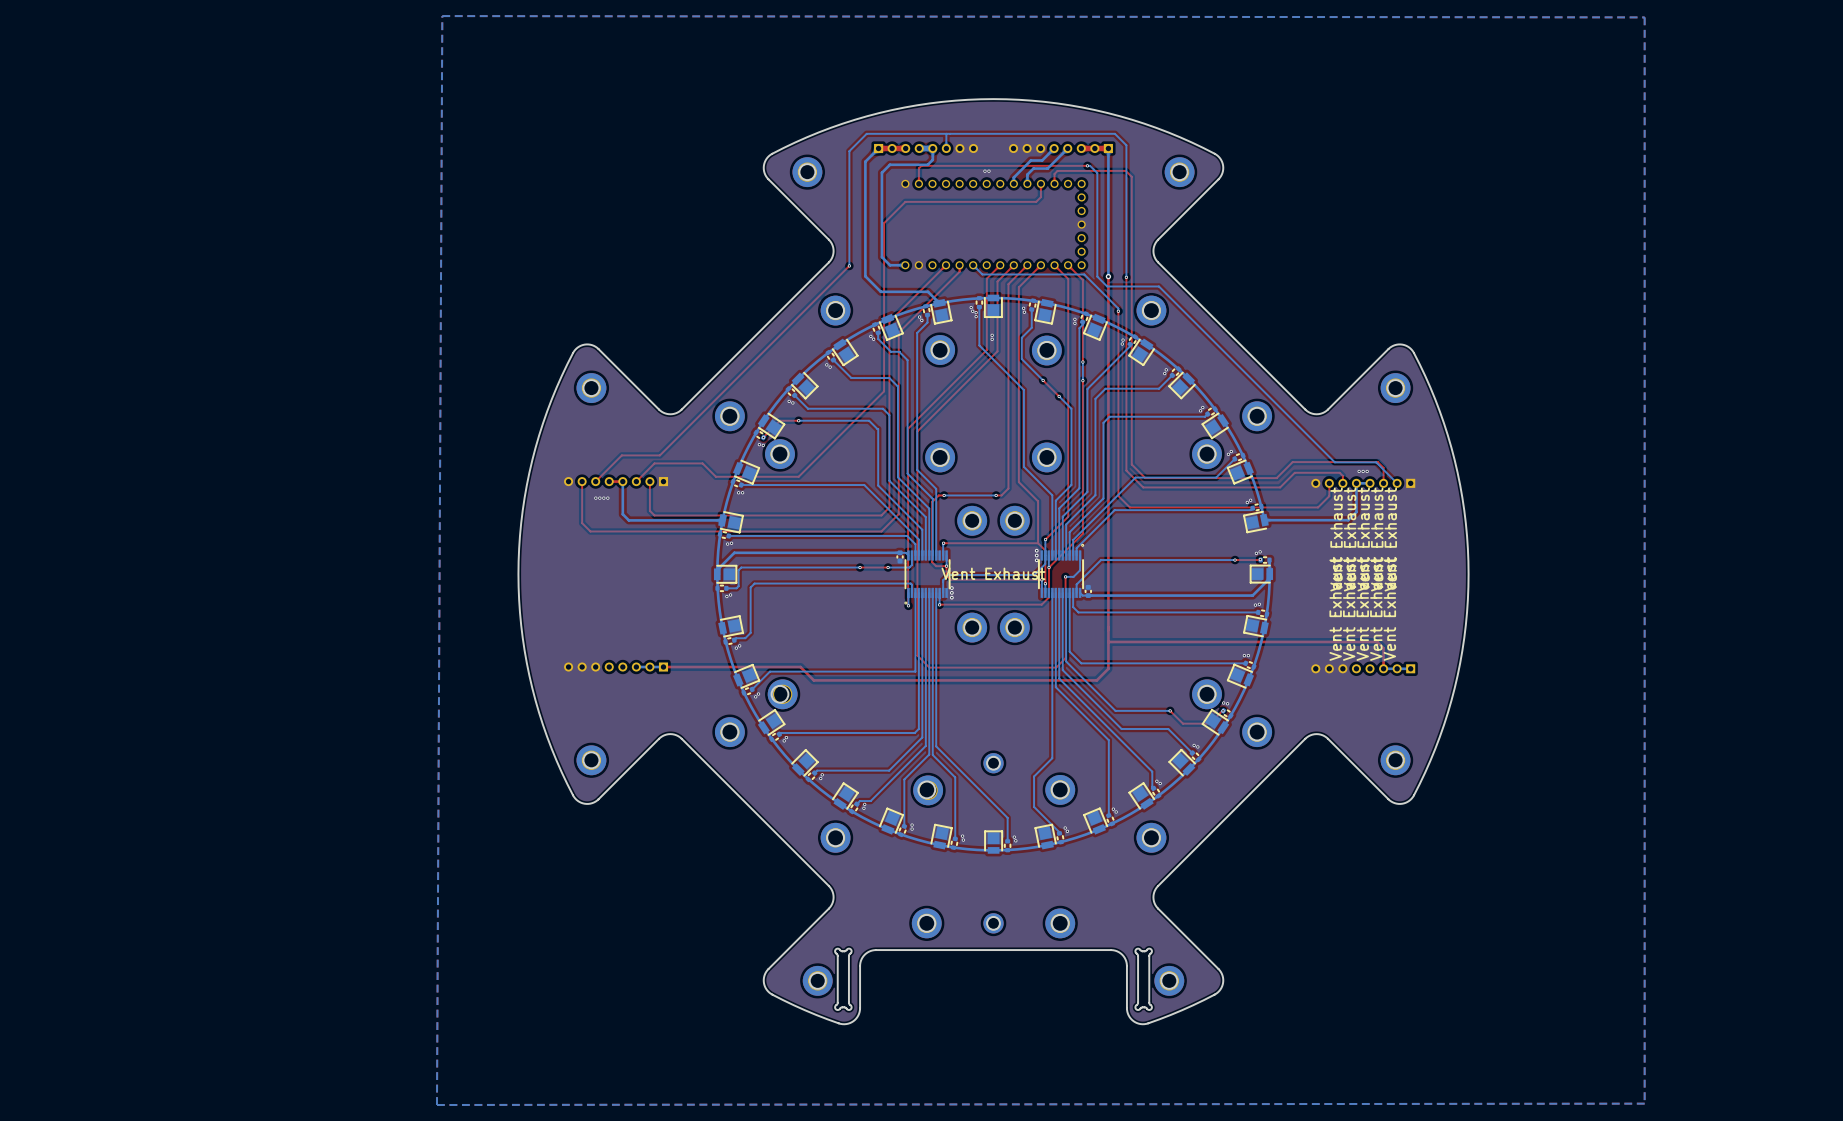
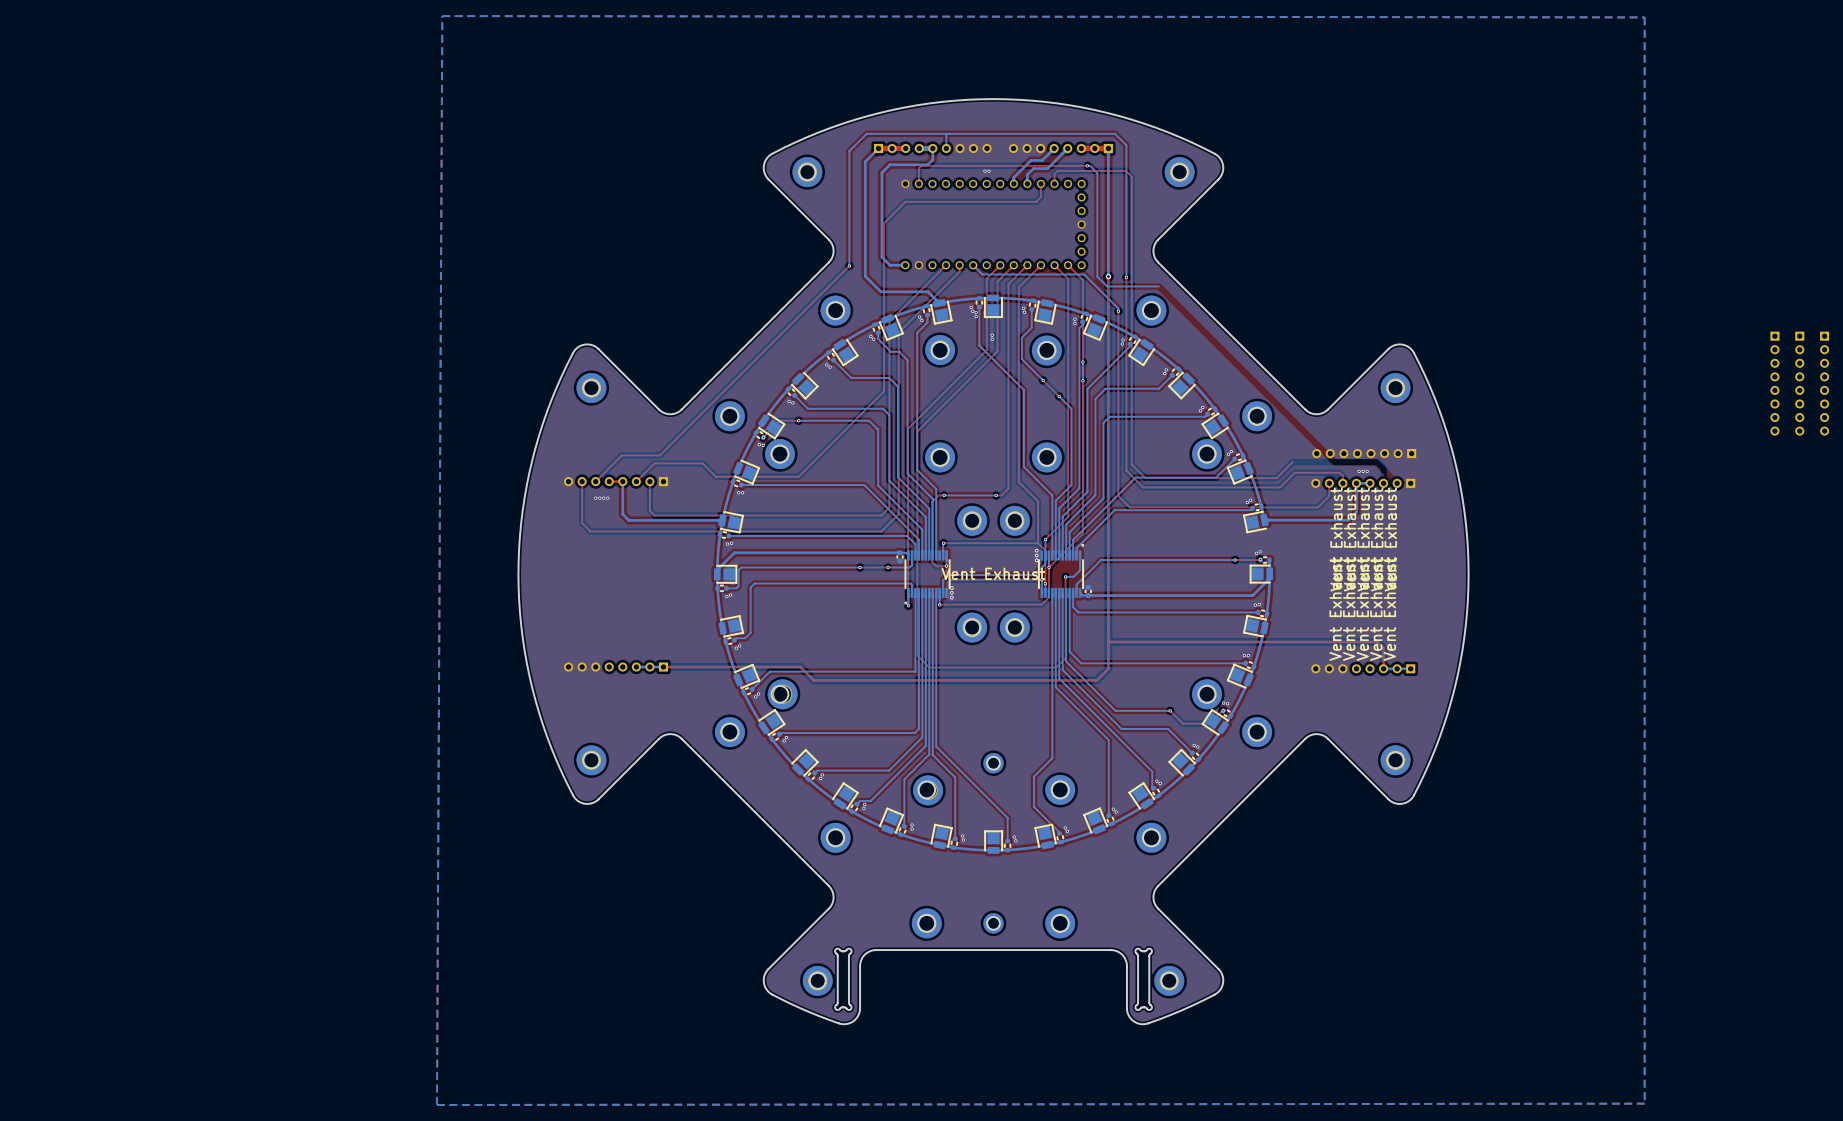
part: (926, 148) -> none
part: none -> (932, 148)
bottom track: (1158, 286) (1334, 462) (1376, 462) (1397, 483) -> none
part: none -> (1774, 383)
part: none -> (1799, 383)
part: none -> (1824, 383)
part: none -> (1364, 453)
top track: (1292, 462) (1377, 462) (1383, 467) (1383, 483) -> none

